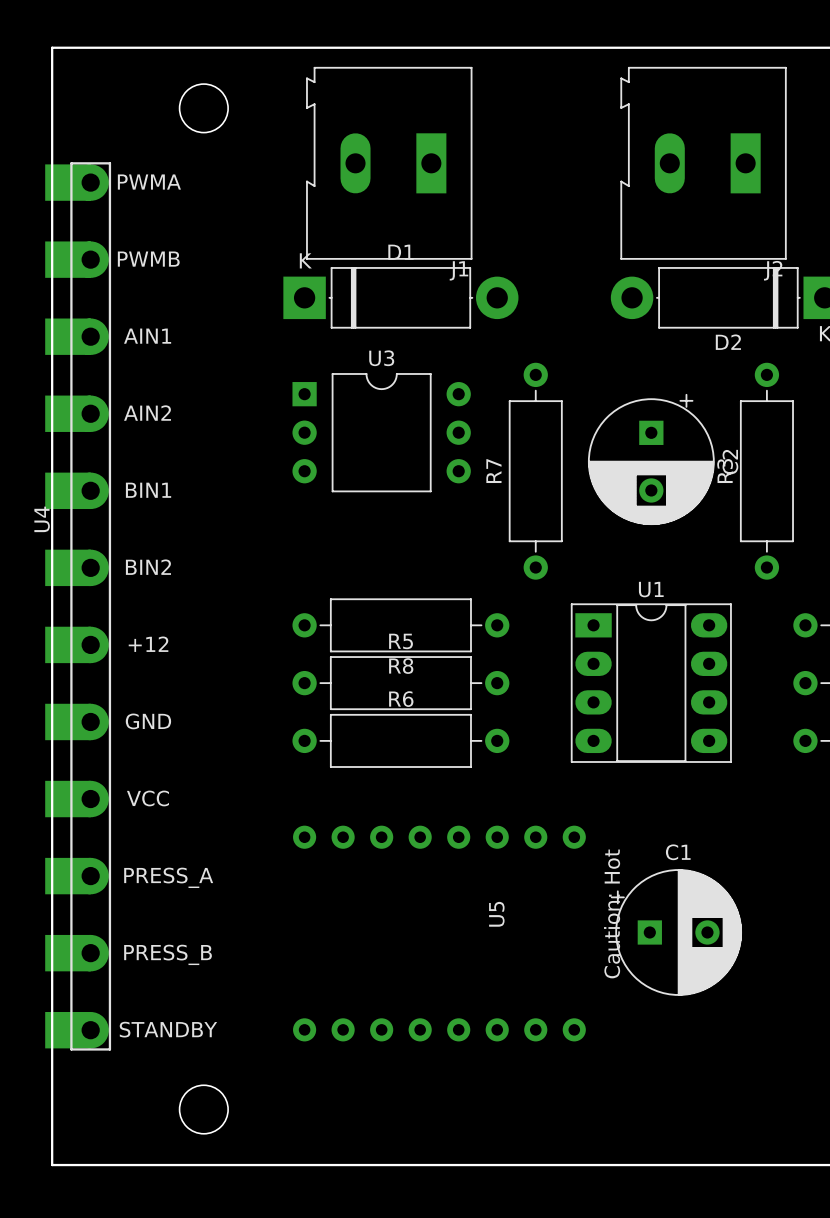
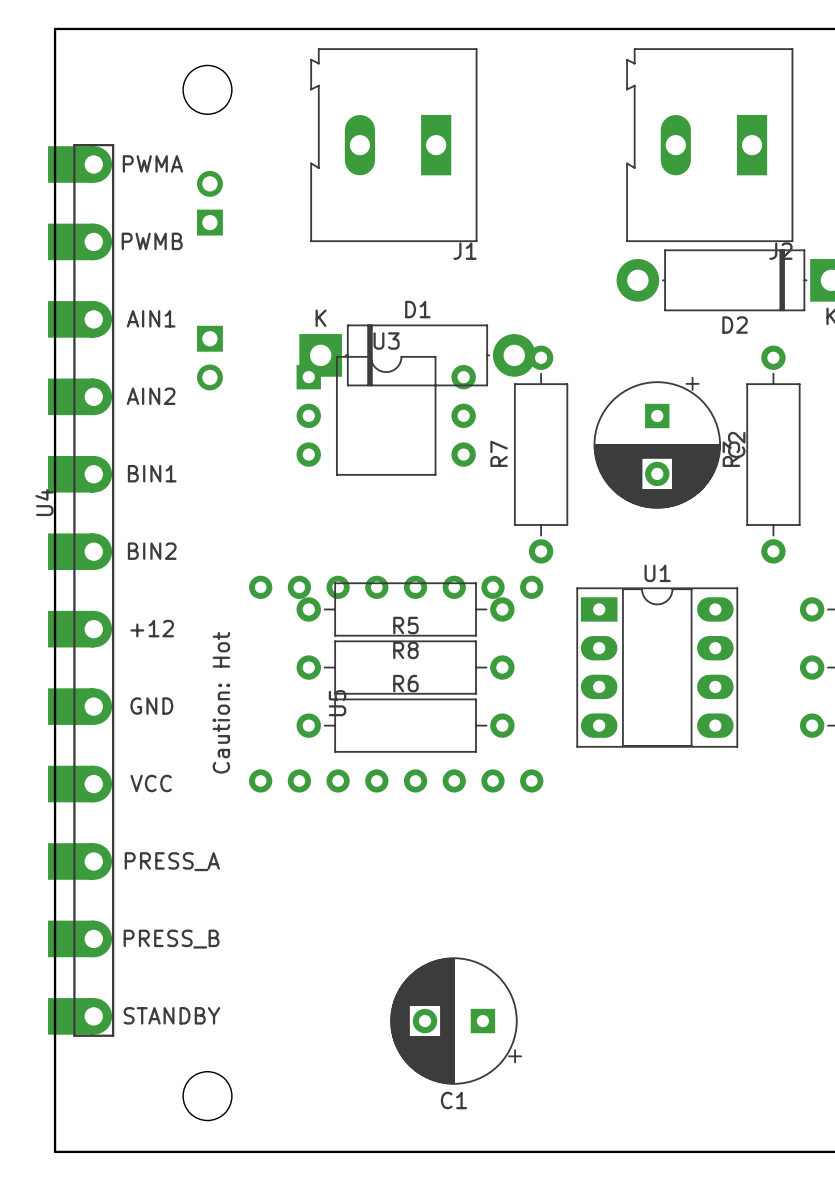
part: none -> (209, 203)
D1 position: (400, 297) -> (417, 355)
part: none -> (209, 358)
C1 rotation: 0° (676, 932) -> 180° (456, 1021)
C1 position: (676, 932) -> (456, 1021)
U5 rotation: 0° (439, 933) -> 180° (396, 684)
U5 position: (439, 933) -> (396, 684)

